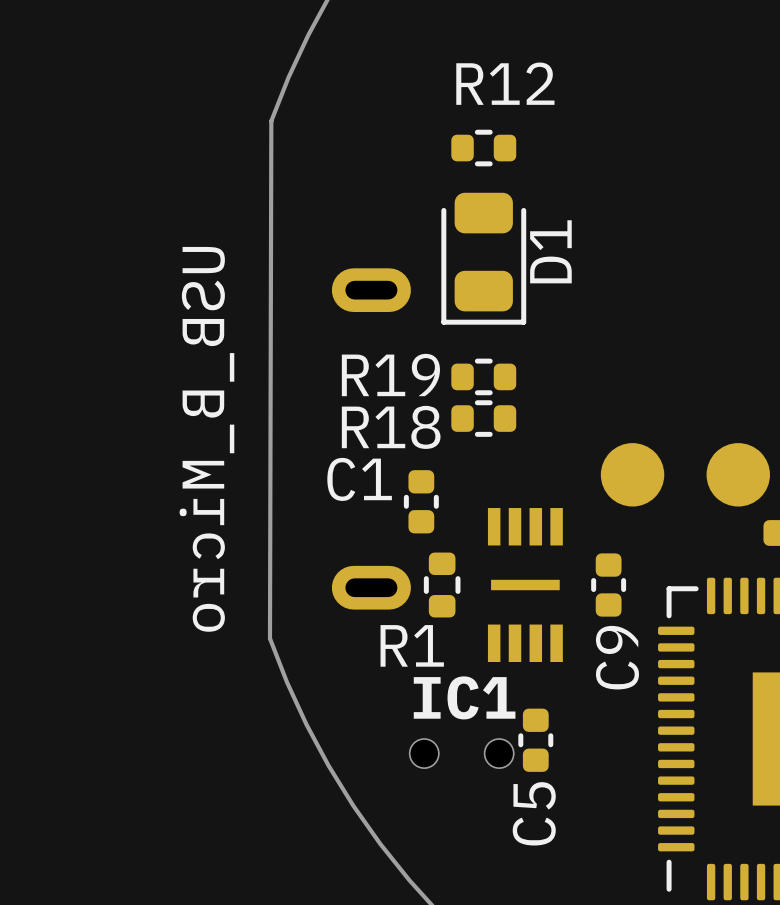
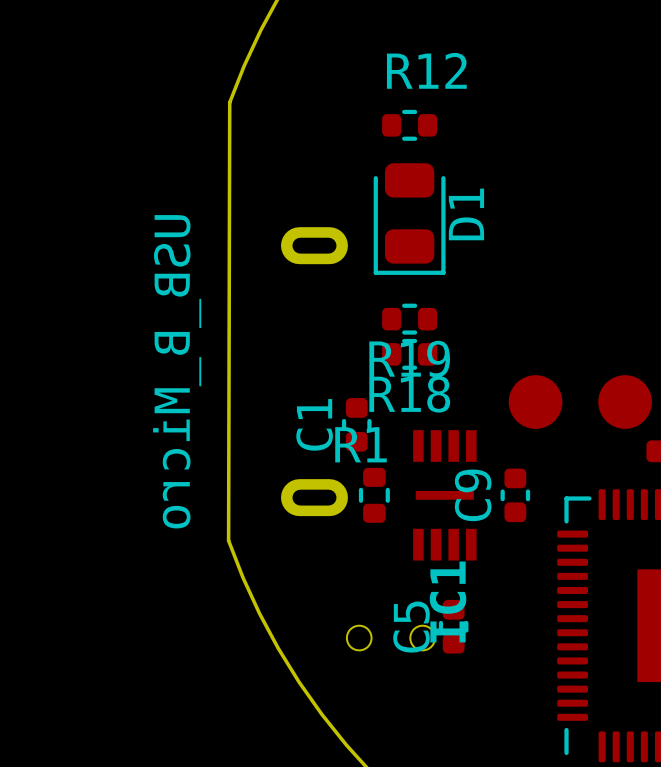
R19 name position: R19 (390, 375) -> R19 (409, 359)
R18 name position: R18 (391, 427) -> R18 (409, 394)
C1 name rotation: 0° (359, 479) -> 90° counterclockwise (314, 424)
R1 name position: R1 (412, 645) -> R1 (361, 444)
C9 name position: C9 (617, 657) -> C9 (473, 495)
IC1 name rotation: 0° (464, 697) -> 90° counterclockwise (448, 601)
C5 name position: C5 (534, 813) -> C5 (411, 627)

